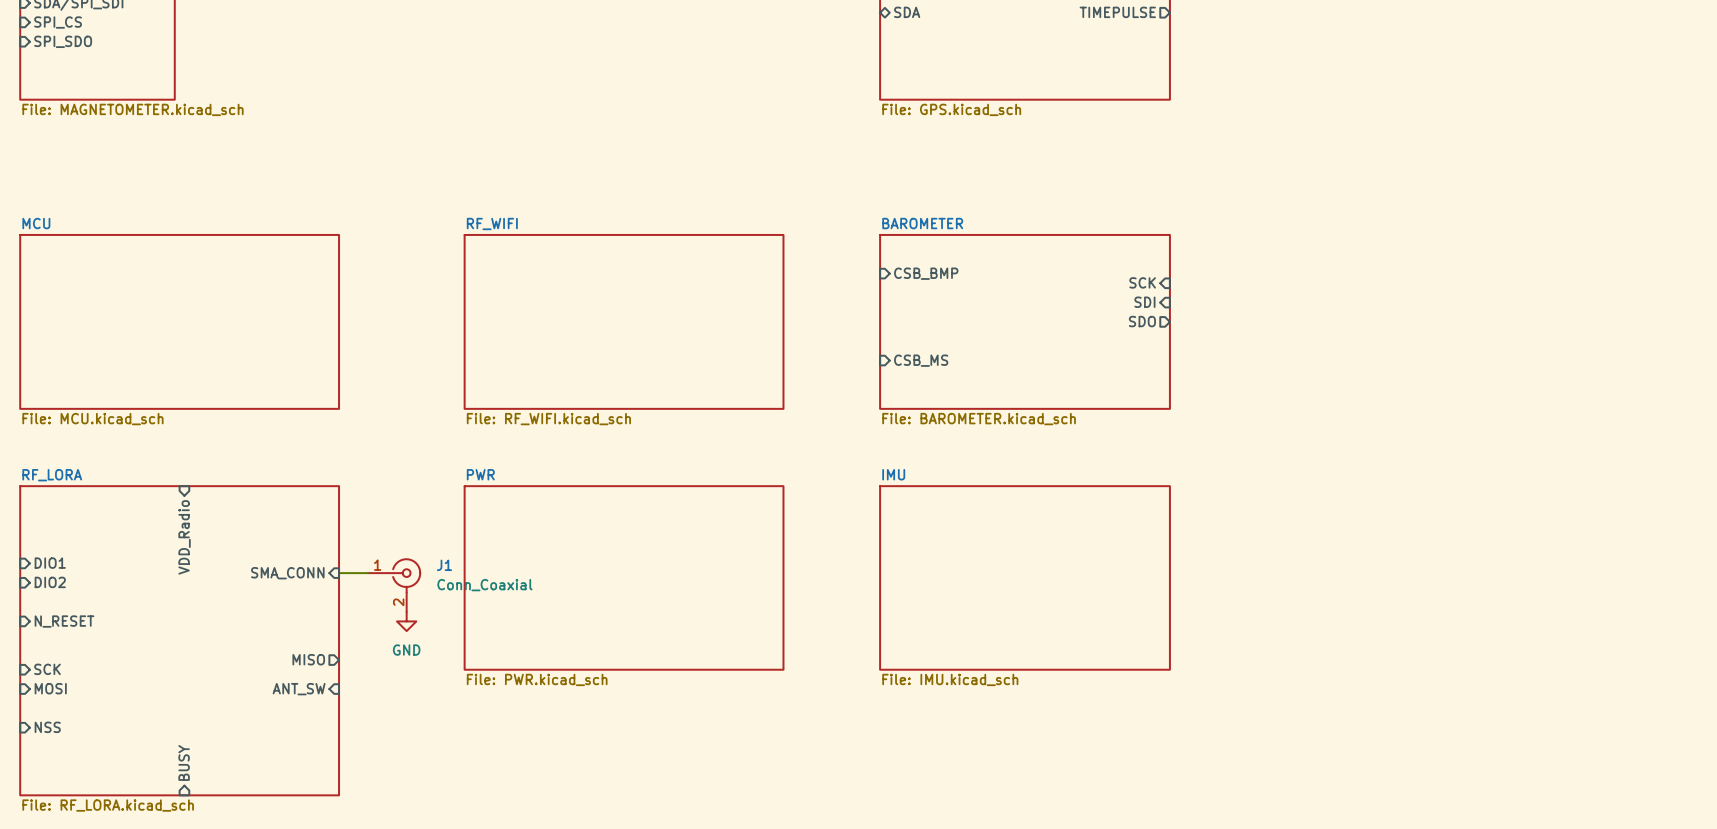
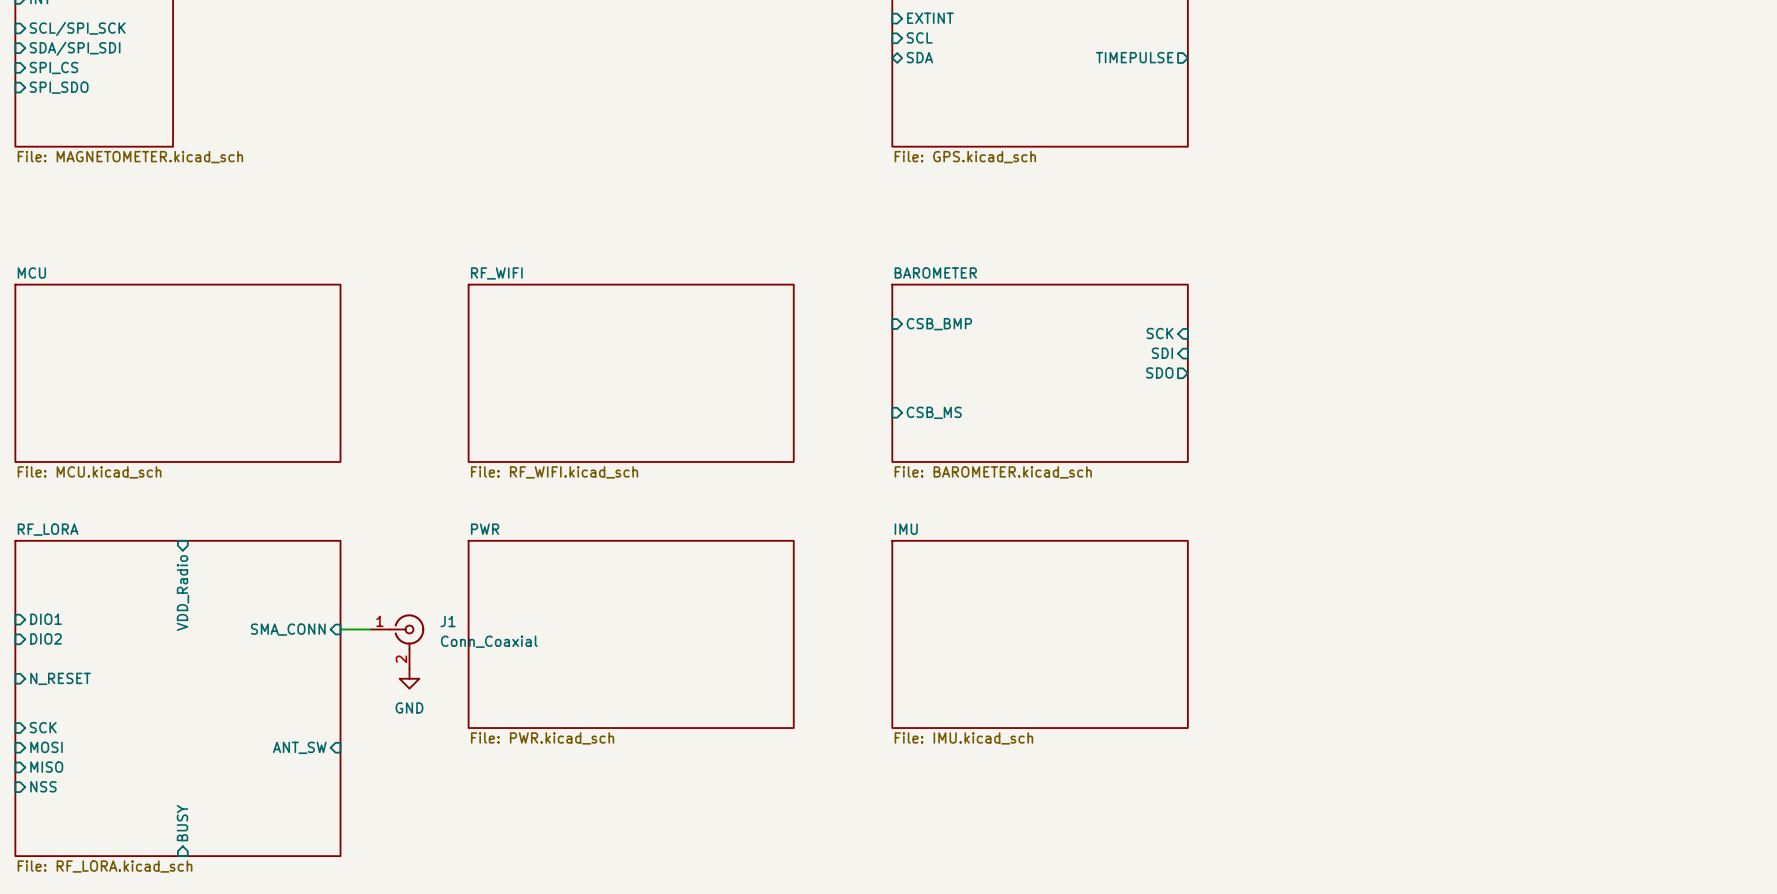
sheet pin: MISO (308, 659) -> none
sheet pin: none -> MISO (46, 767)

